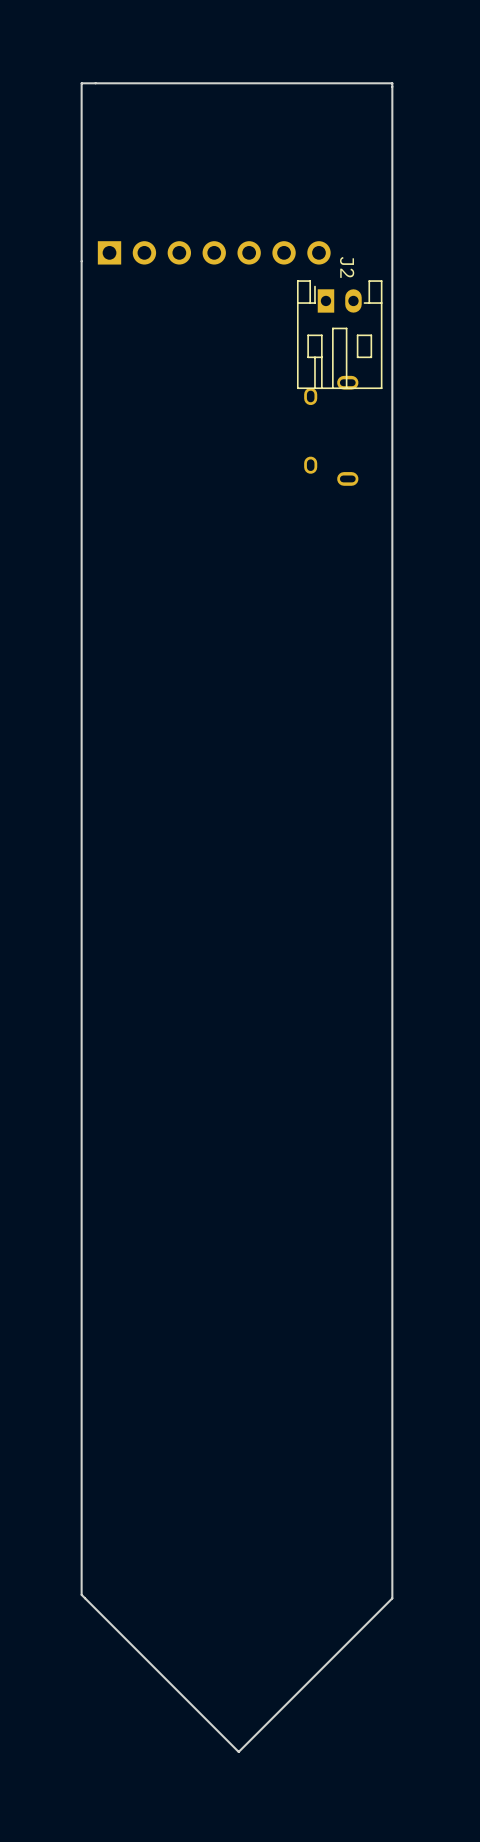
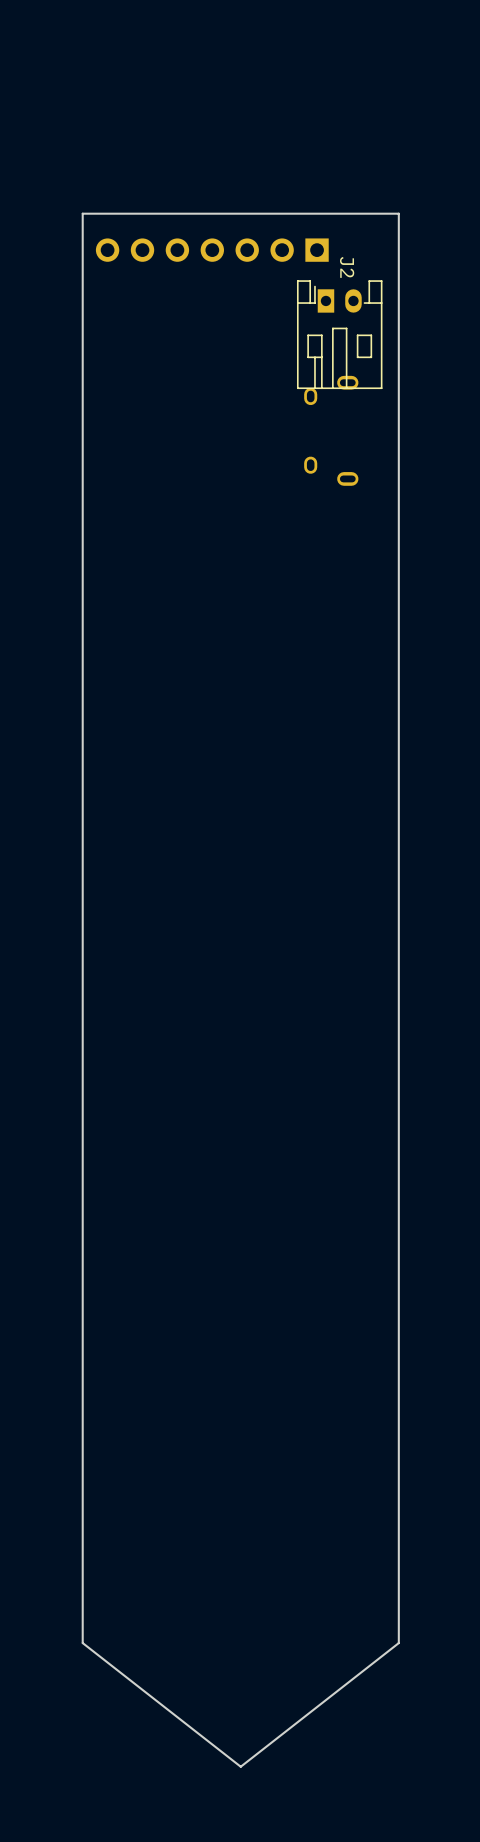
board edge: (392, 83) (81, 83) (81, 1594) (238, 1751) (392, 1598) (392, 83) -> (398, 213) (398, 1643) (240, 1766) (82, 1643) (82, 213) (398, 213)
part rotation: 0° (214, 252) -> 180° (212, 250)

